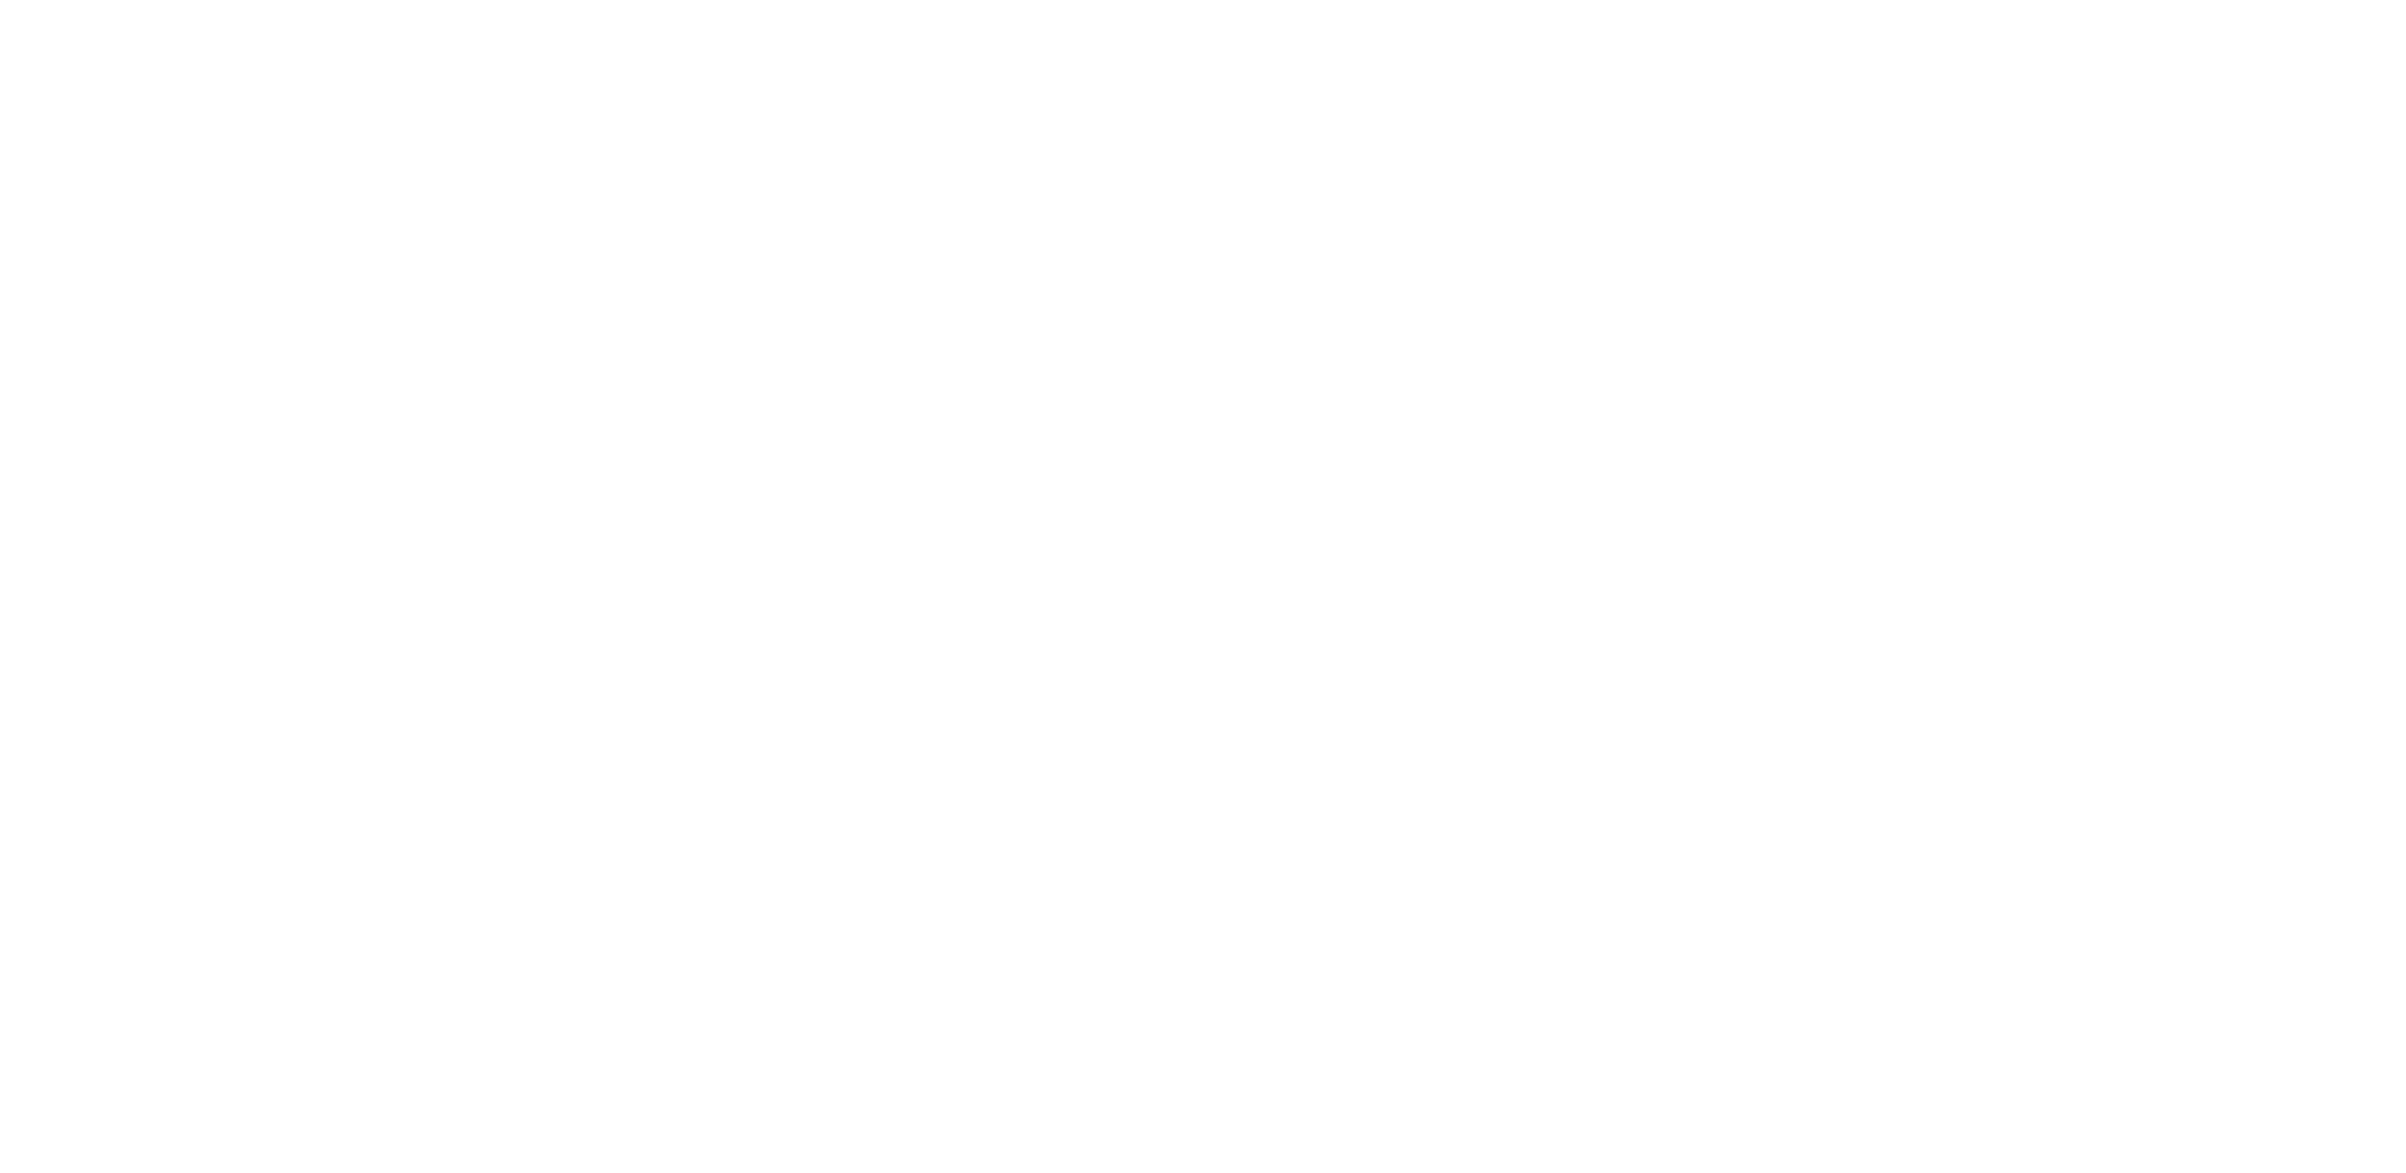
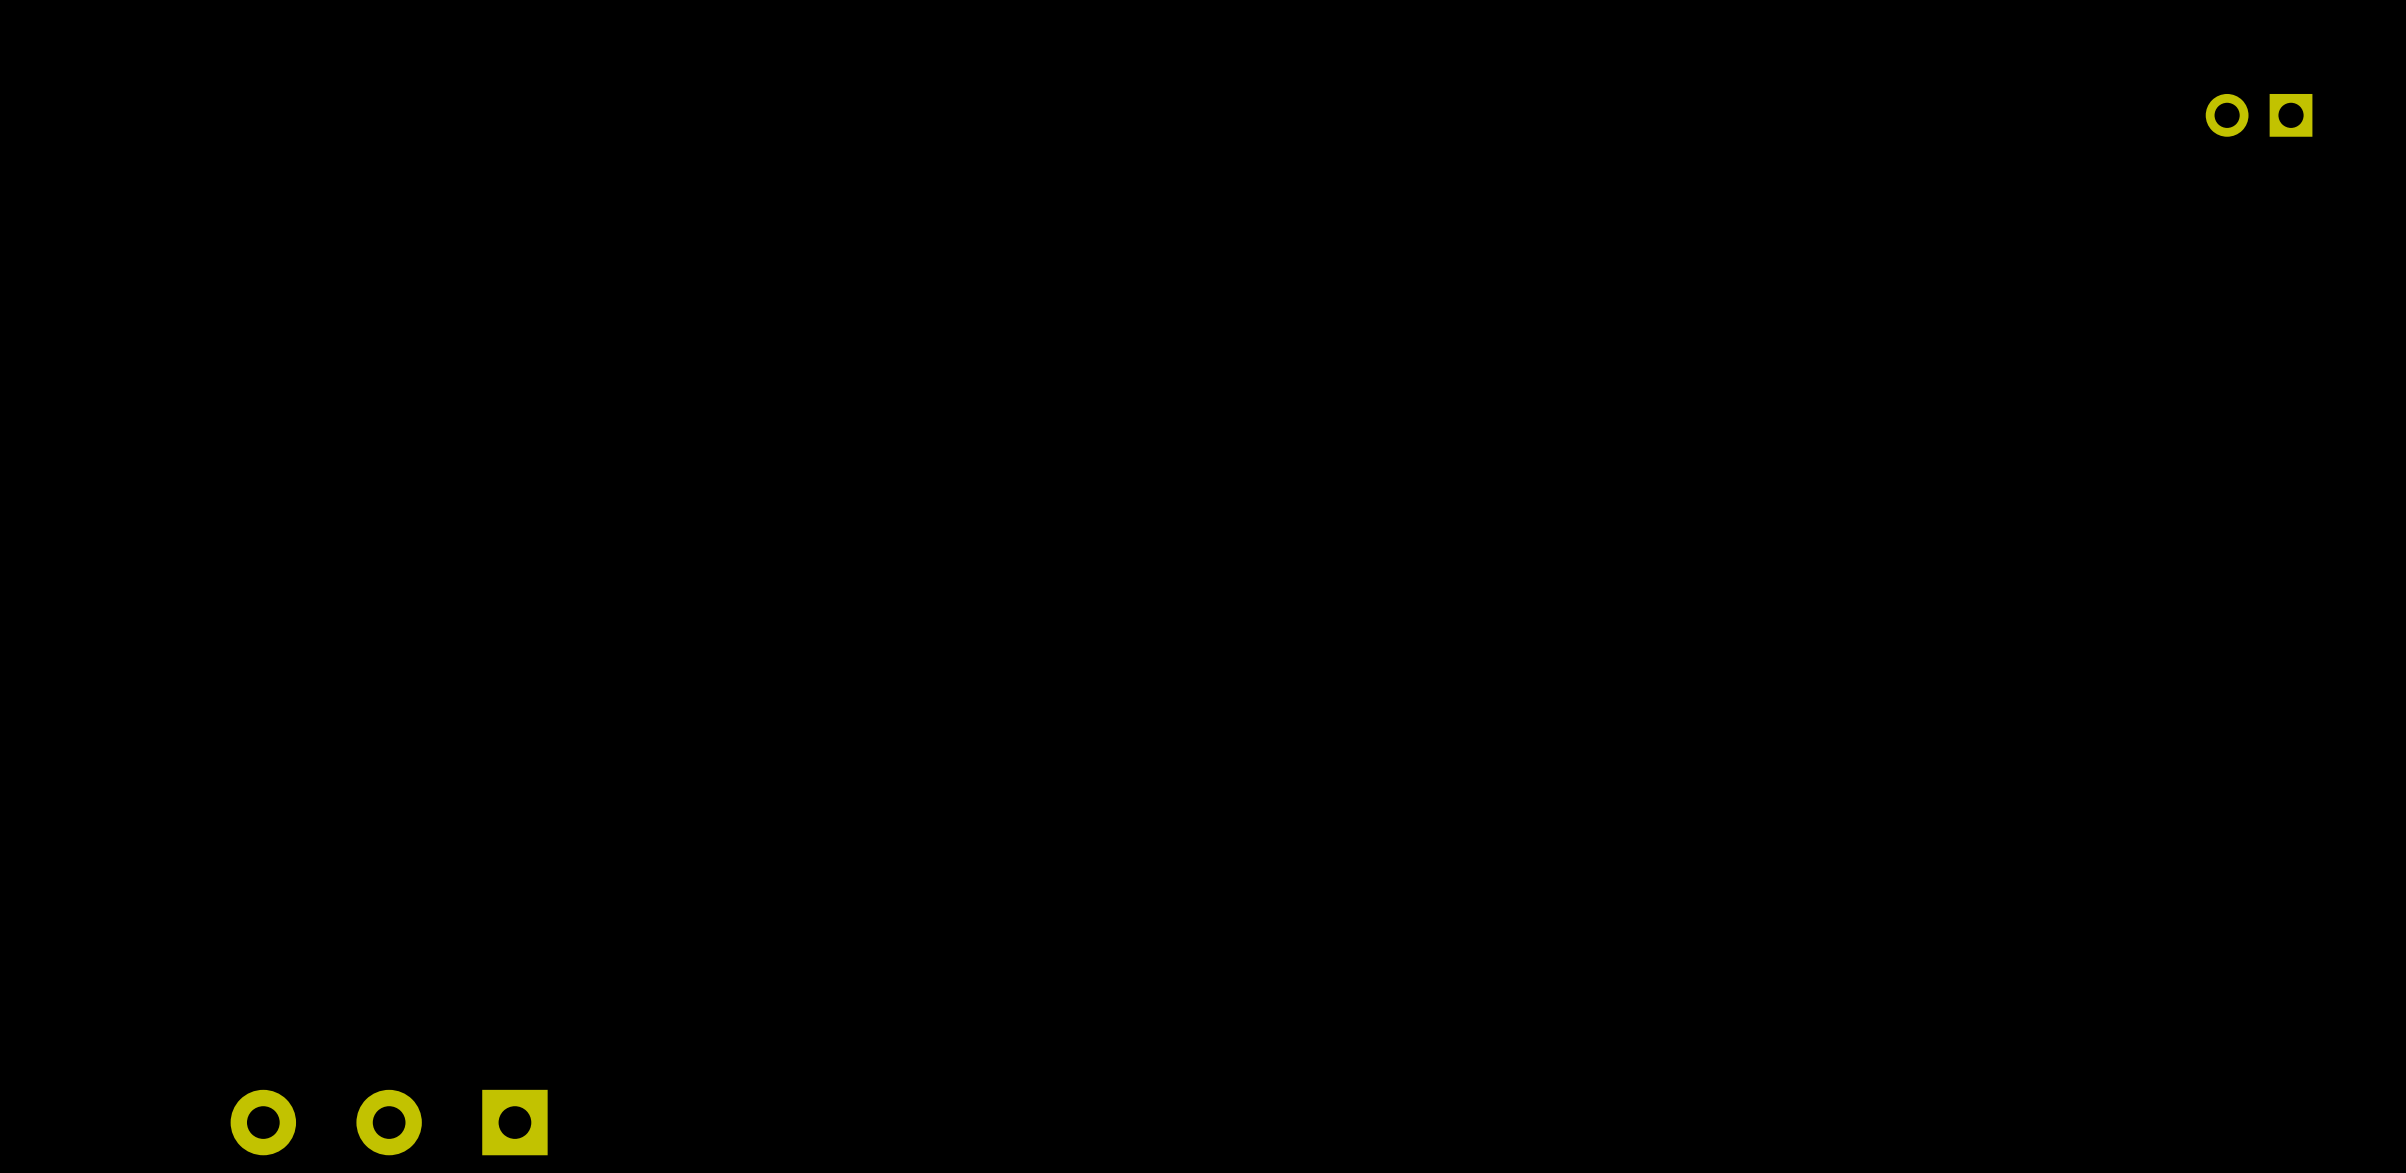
part: none -> (2259, 115)
part: none -> (389, 1122)

